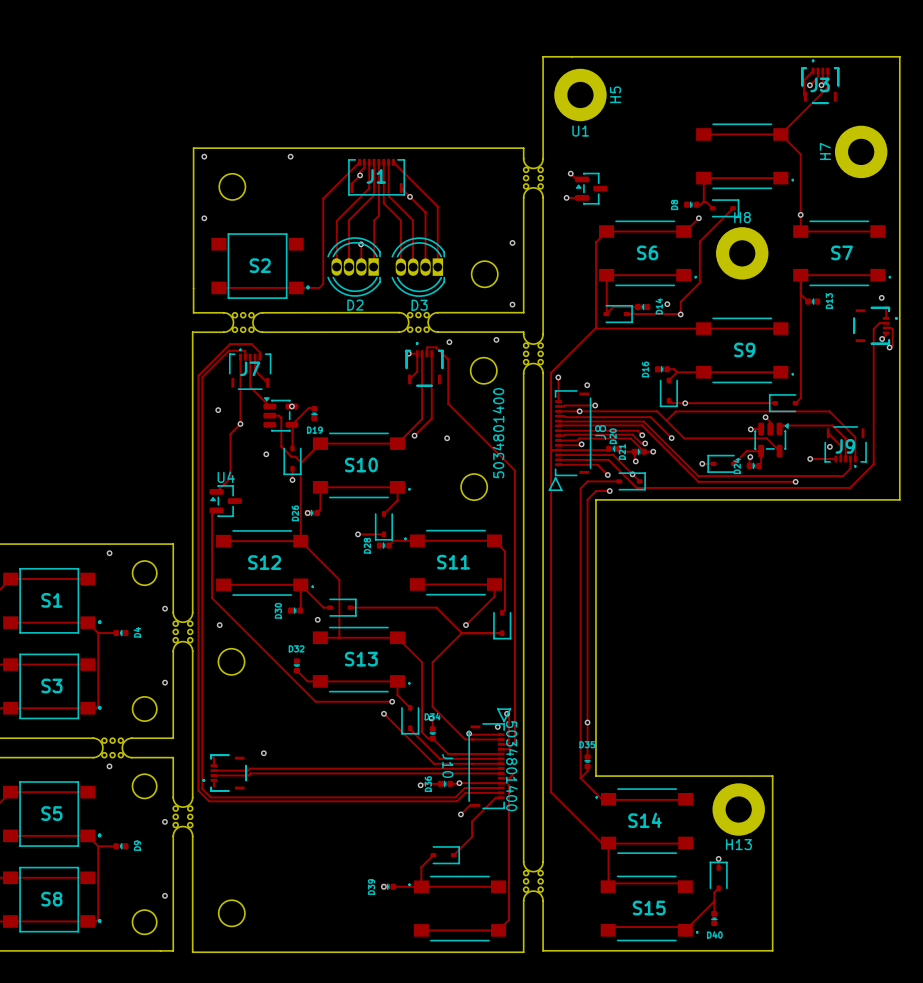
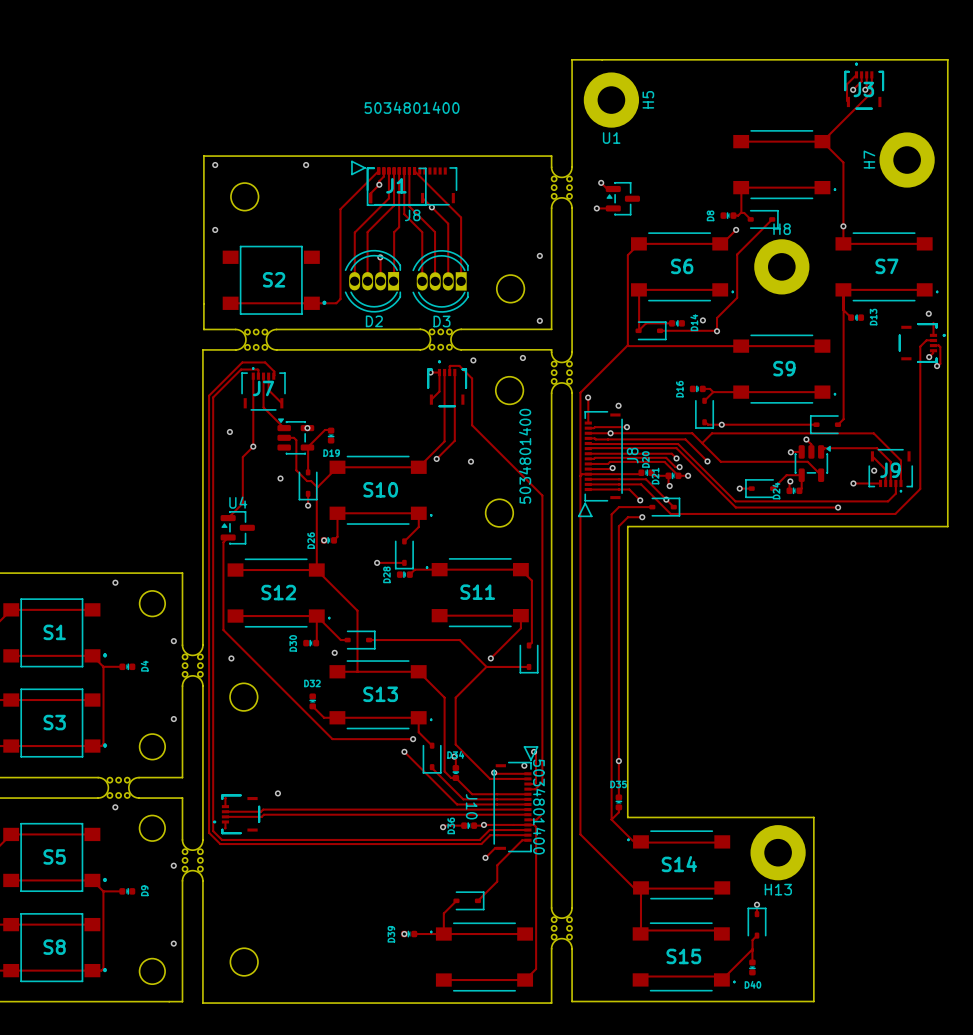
J8: none -> (404, 183)

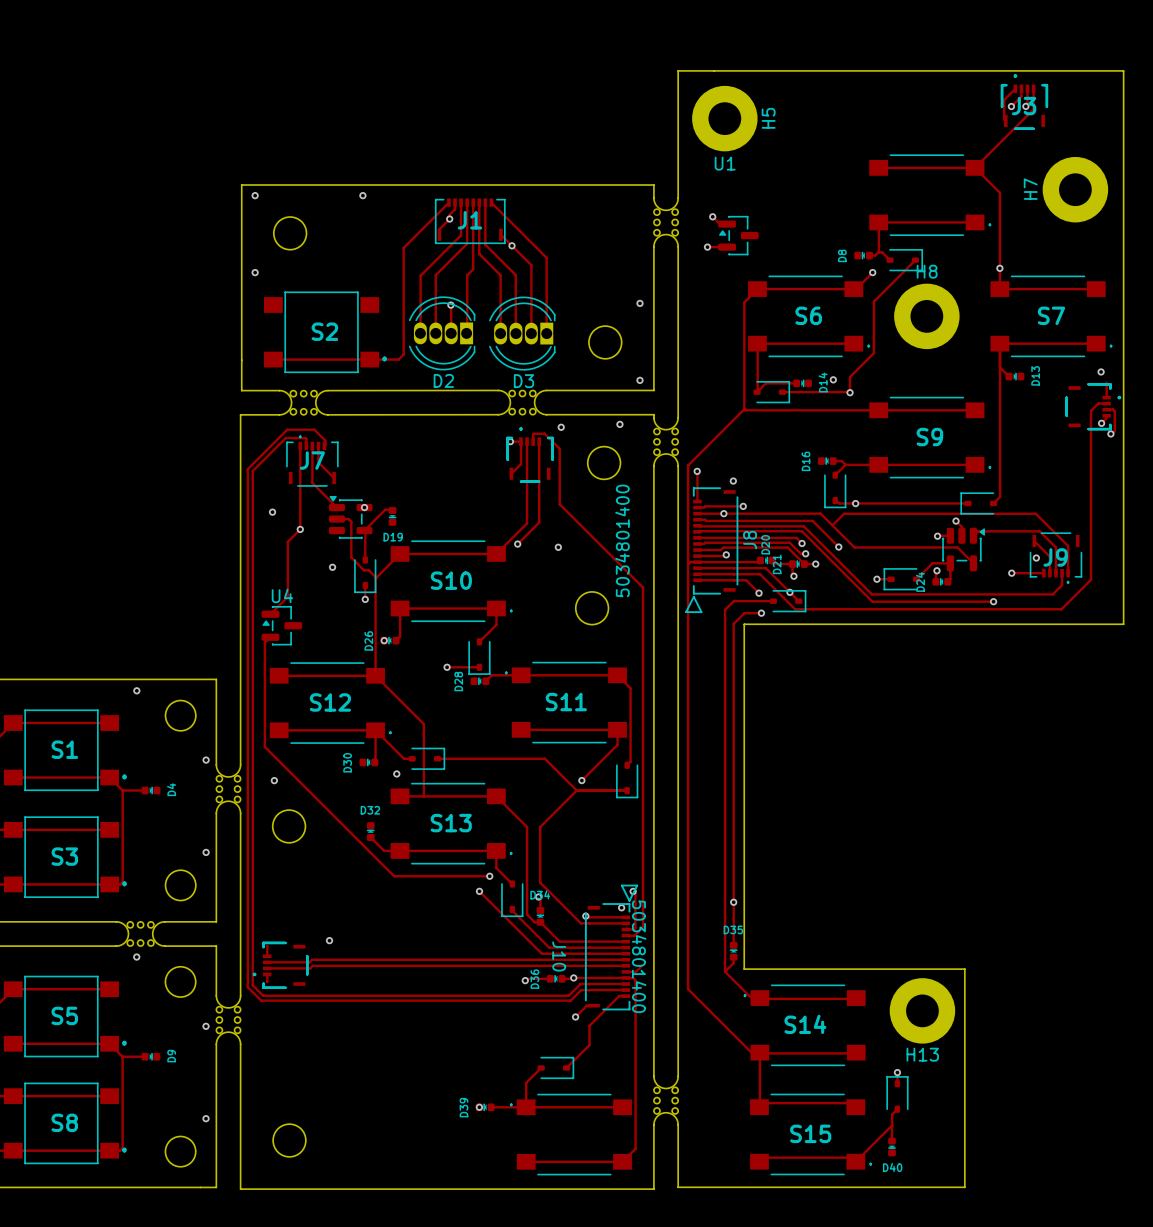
J8: (404, 183) -> none

